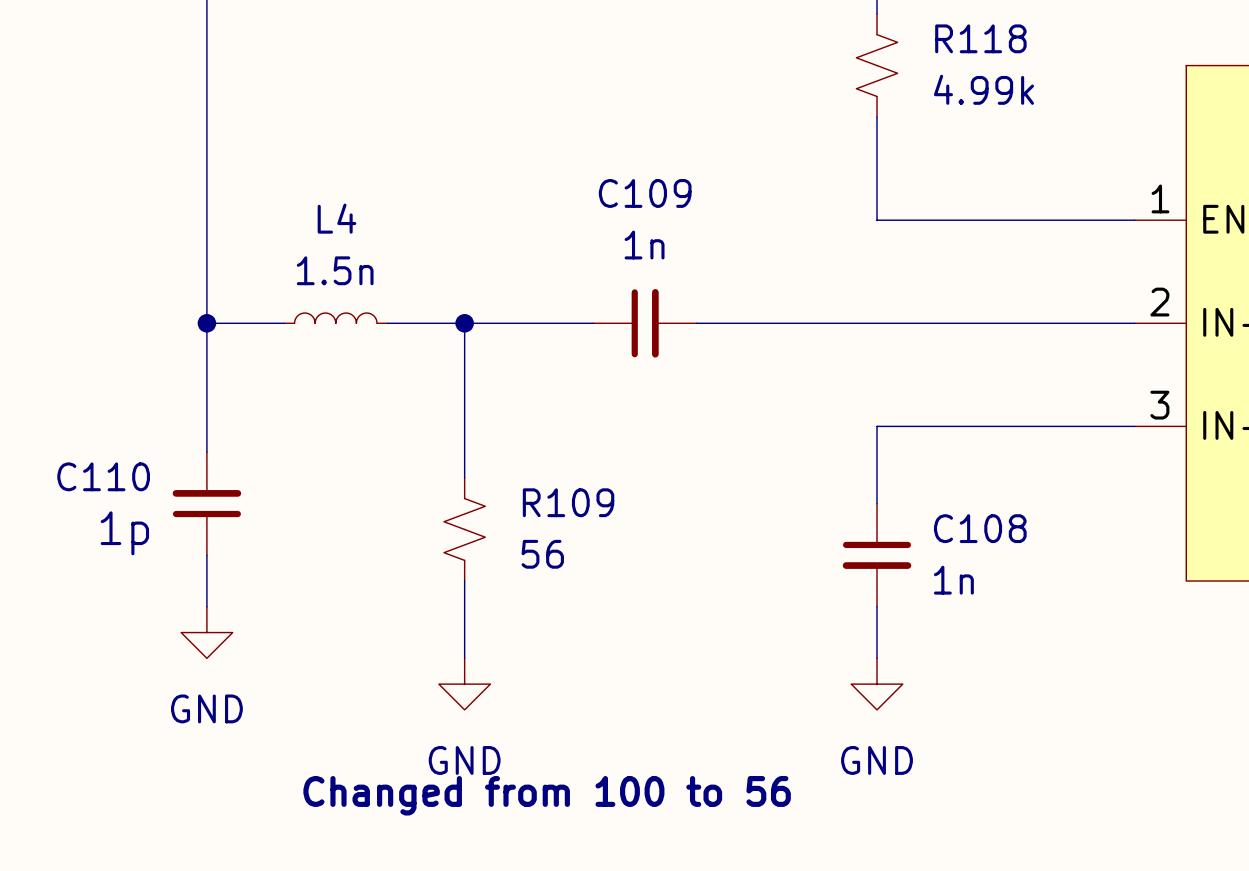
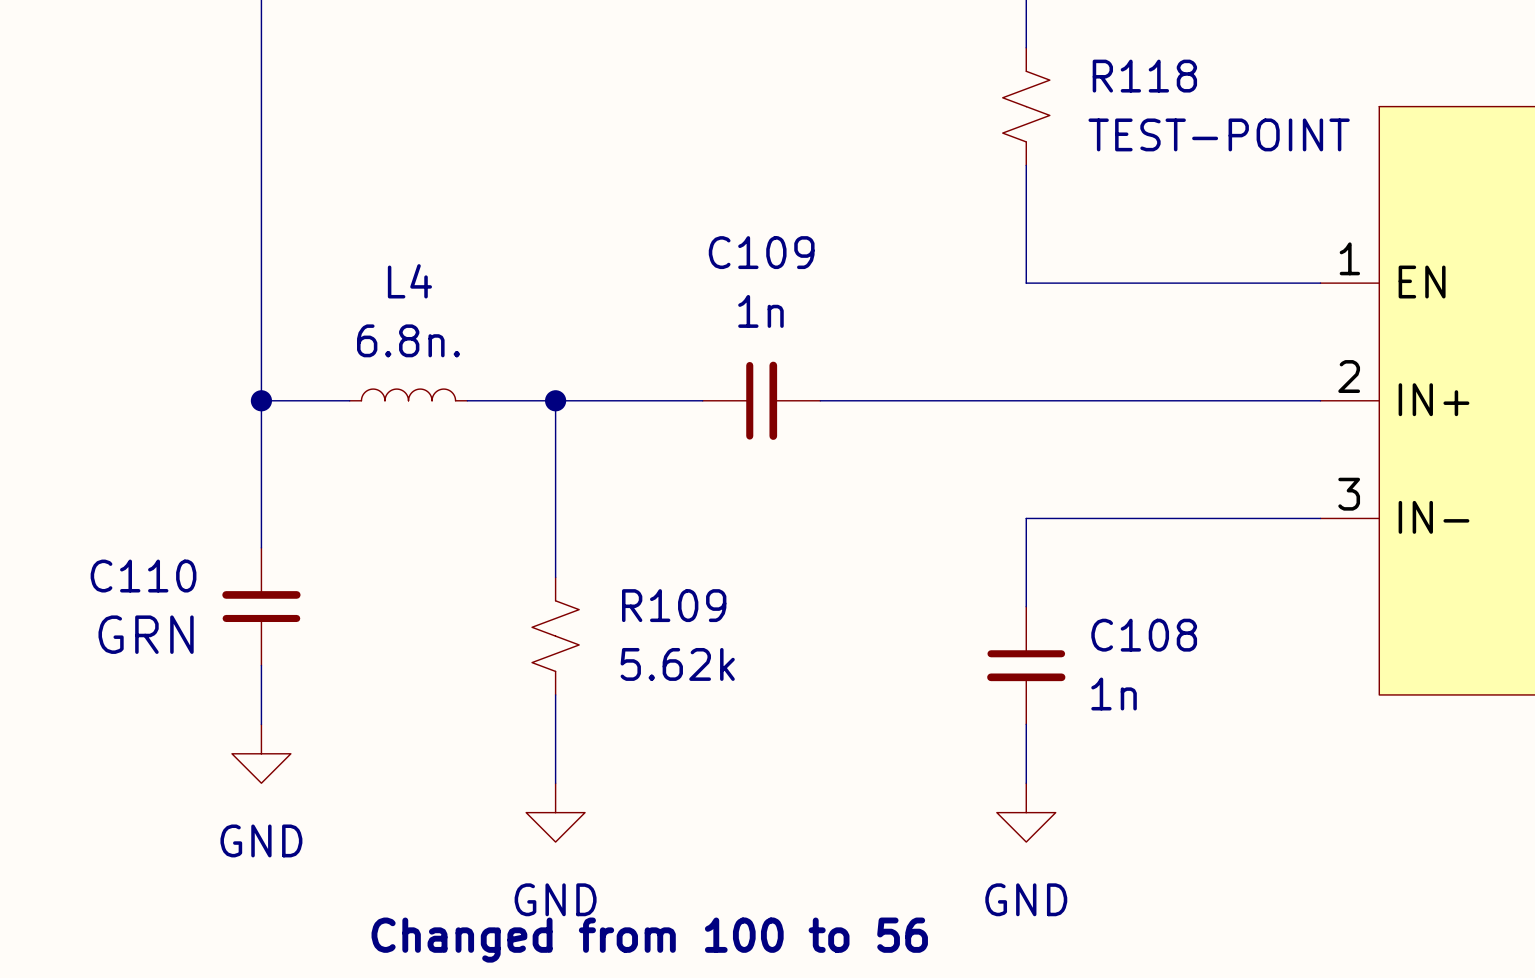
R118 value: 4.99k (983, 89) -> TEST-POINT (1219, 134)
L4 value: 1.5n (335, 270) -> 6.8n. (408, 340)
C110 value: 1p (124, 533) -> GRN (146, 634)
R109 value: 56 (542, 554) -> 5.62k (677, 664)

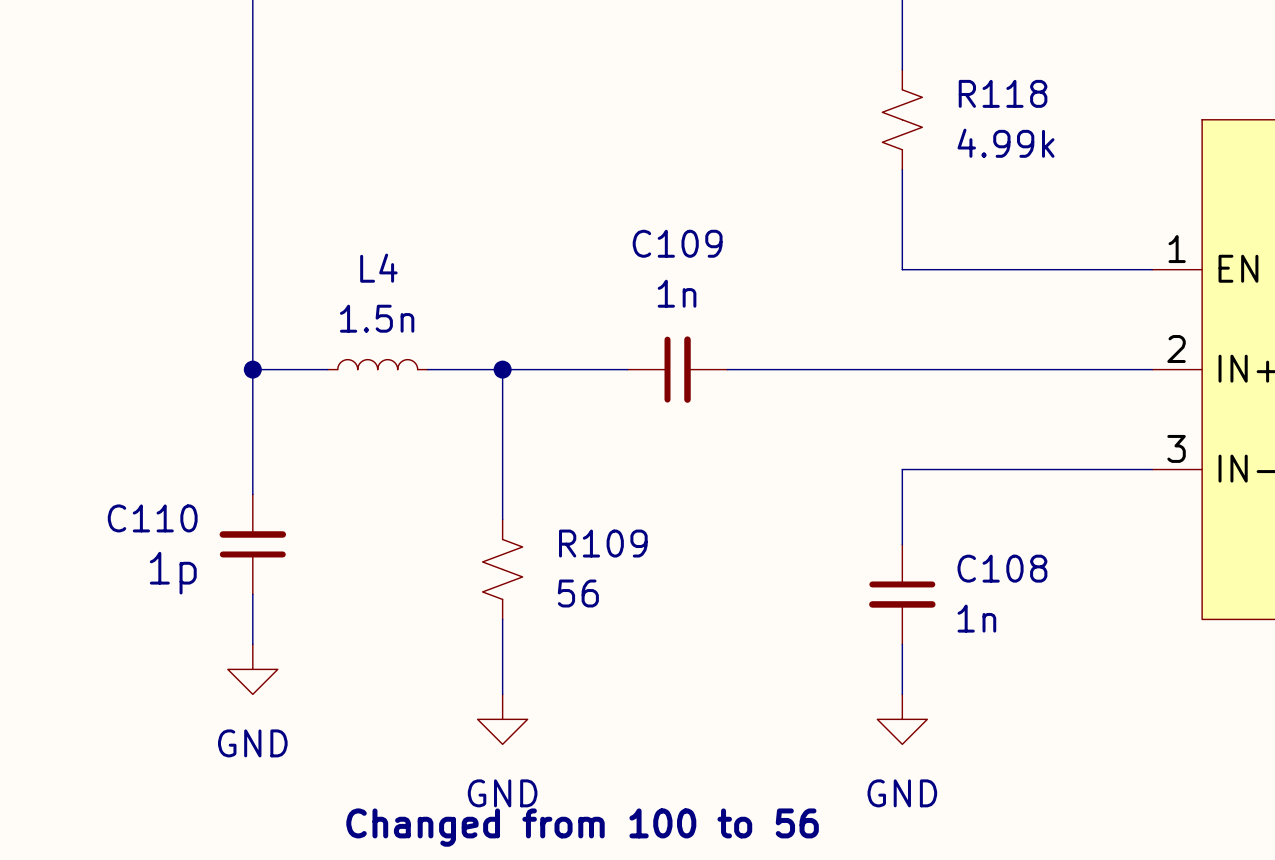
R118 value: TEST-POINT (1219, 134) -> 4.99k (1006, 143)
L4 value: 6.8n. (408, 340) -> 1.5n (377, 318)
C110 value: GRN (146, 634) -> 1p (173, 573)
R109 value: 5.62k (677, 664) -> 56 (578, 593)

